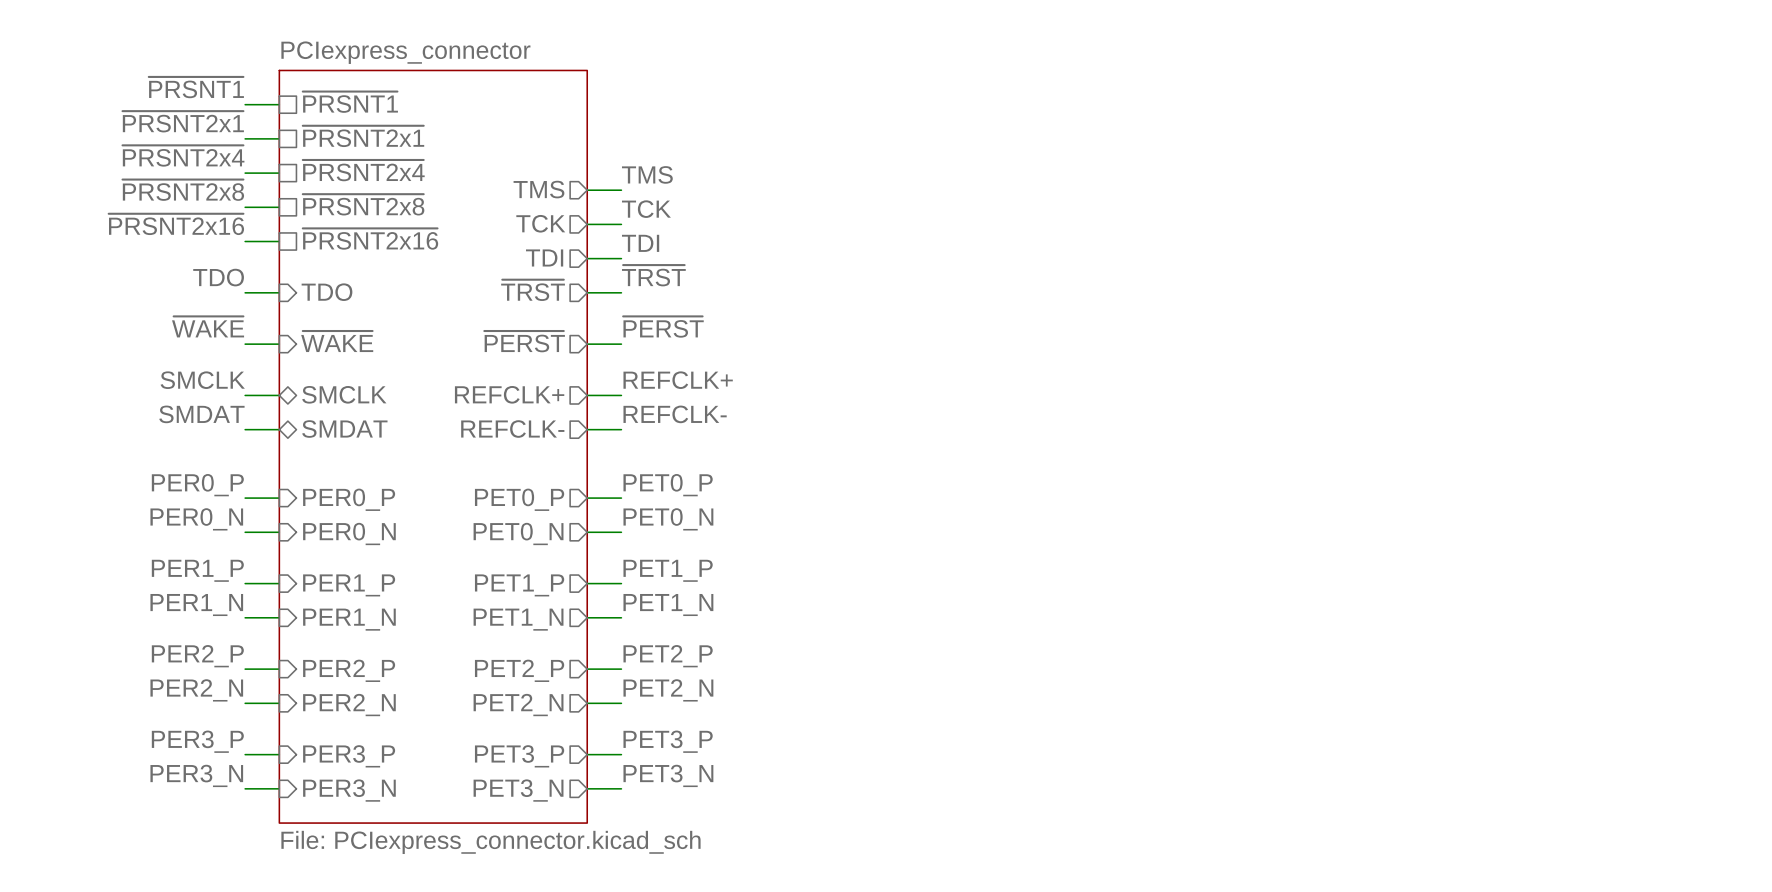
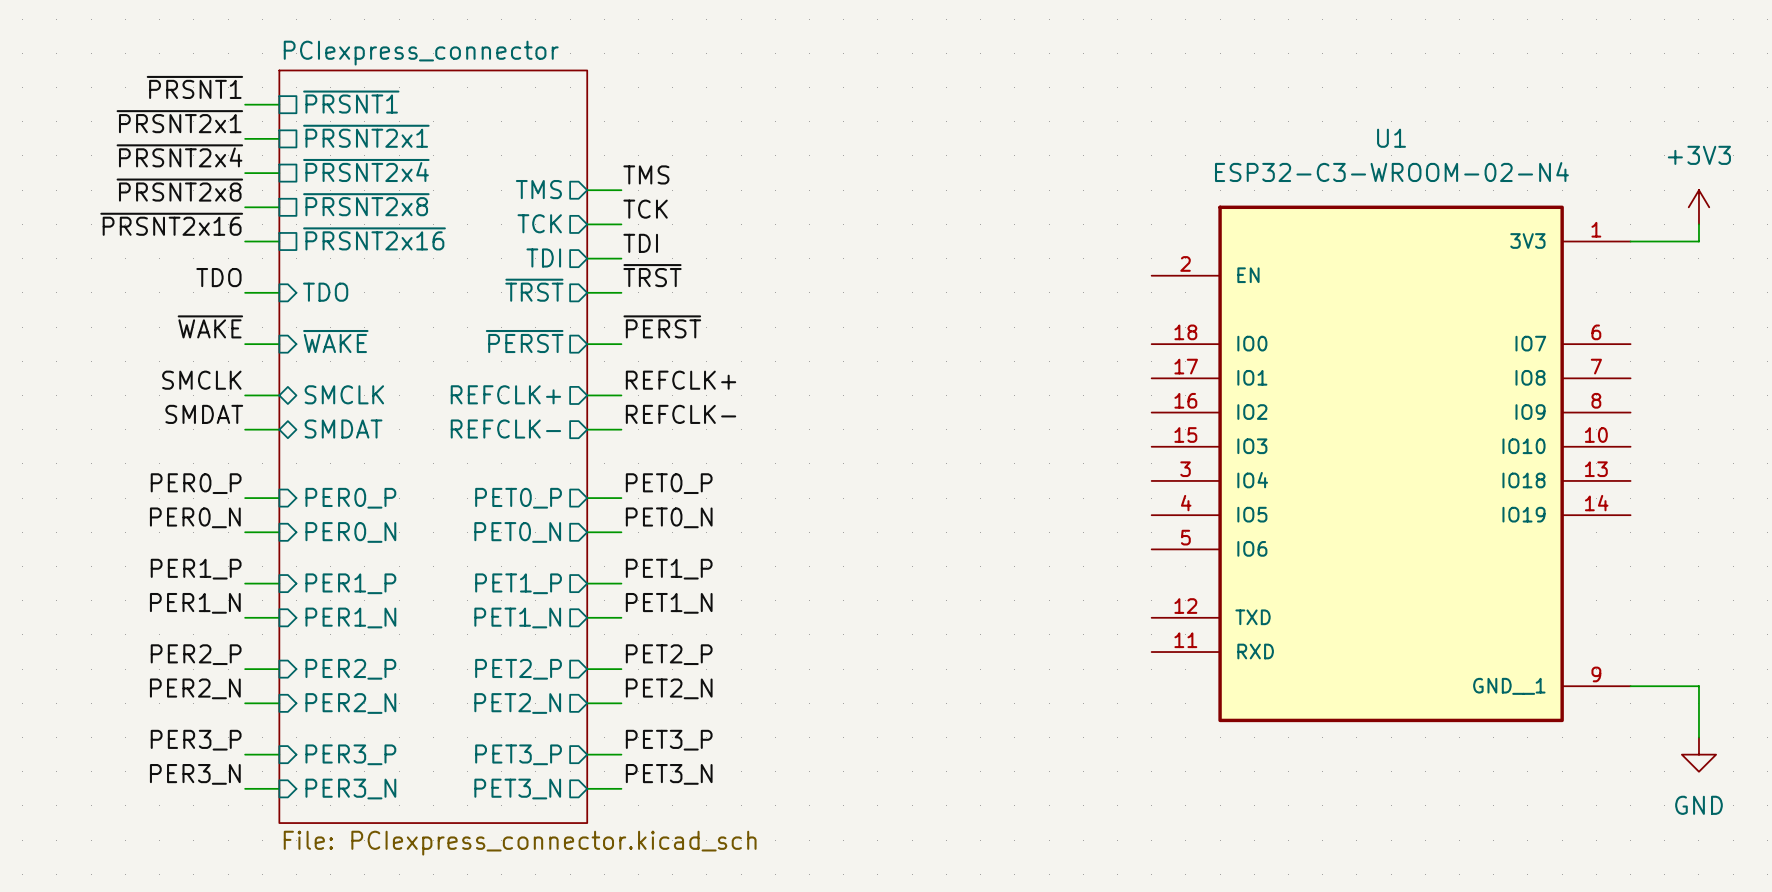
power symbol: none -> +3V3 (1698, 207)
wire: none -> (1698, 224) (1698, 241) (1630, 241)
U1: none -> ESP32-C3-WROOM-02-N4 (1391, 463)
wire: none -> (1630, 686) (1698, 686) (1698, 737)
power symbol: none -> GND (1698, 754)

